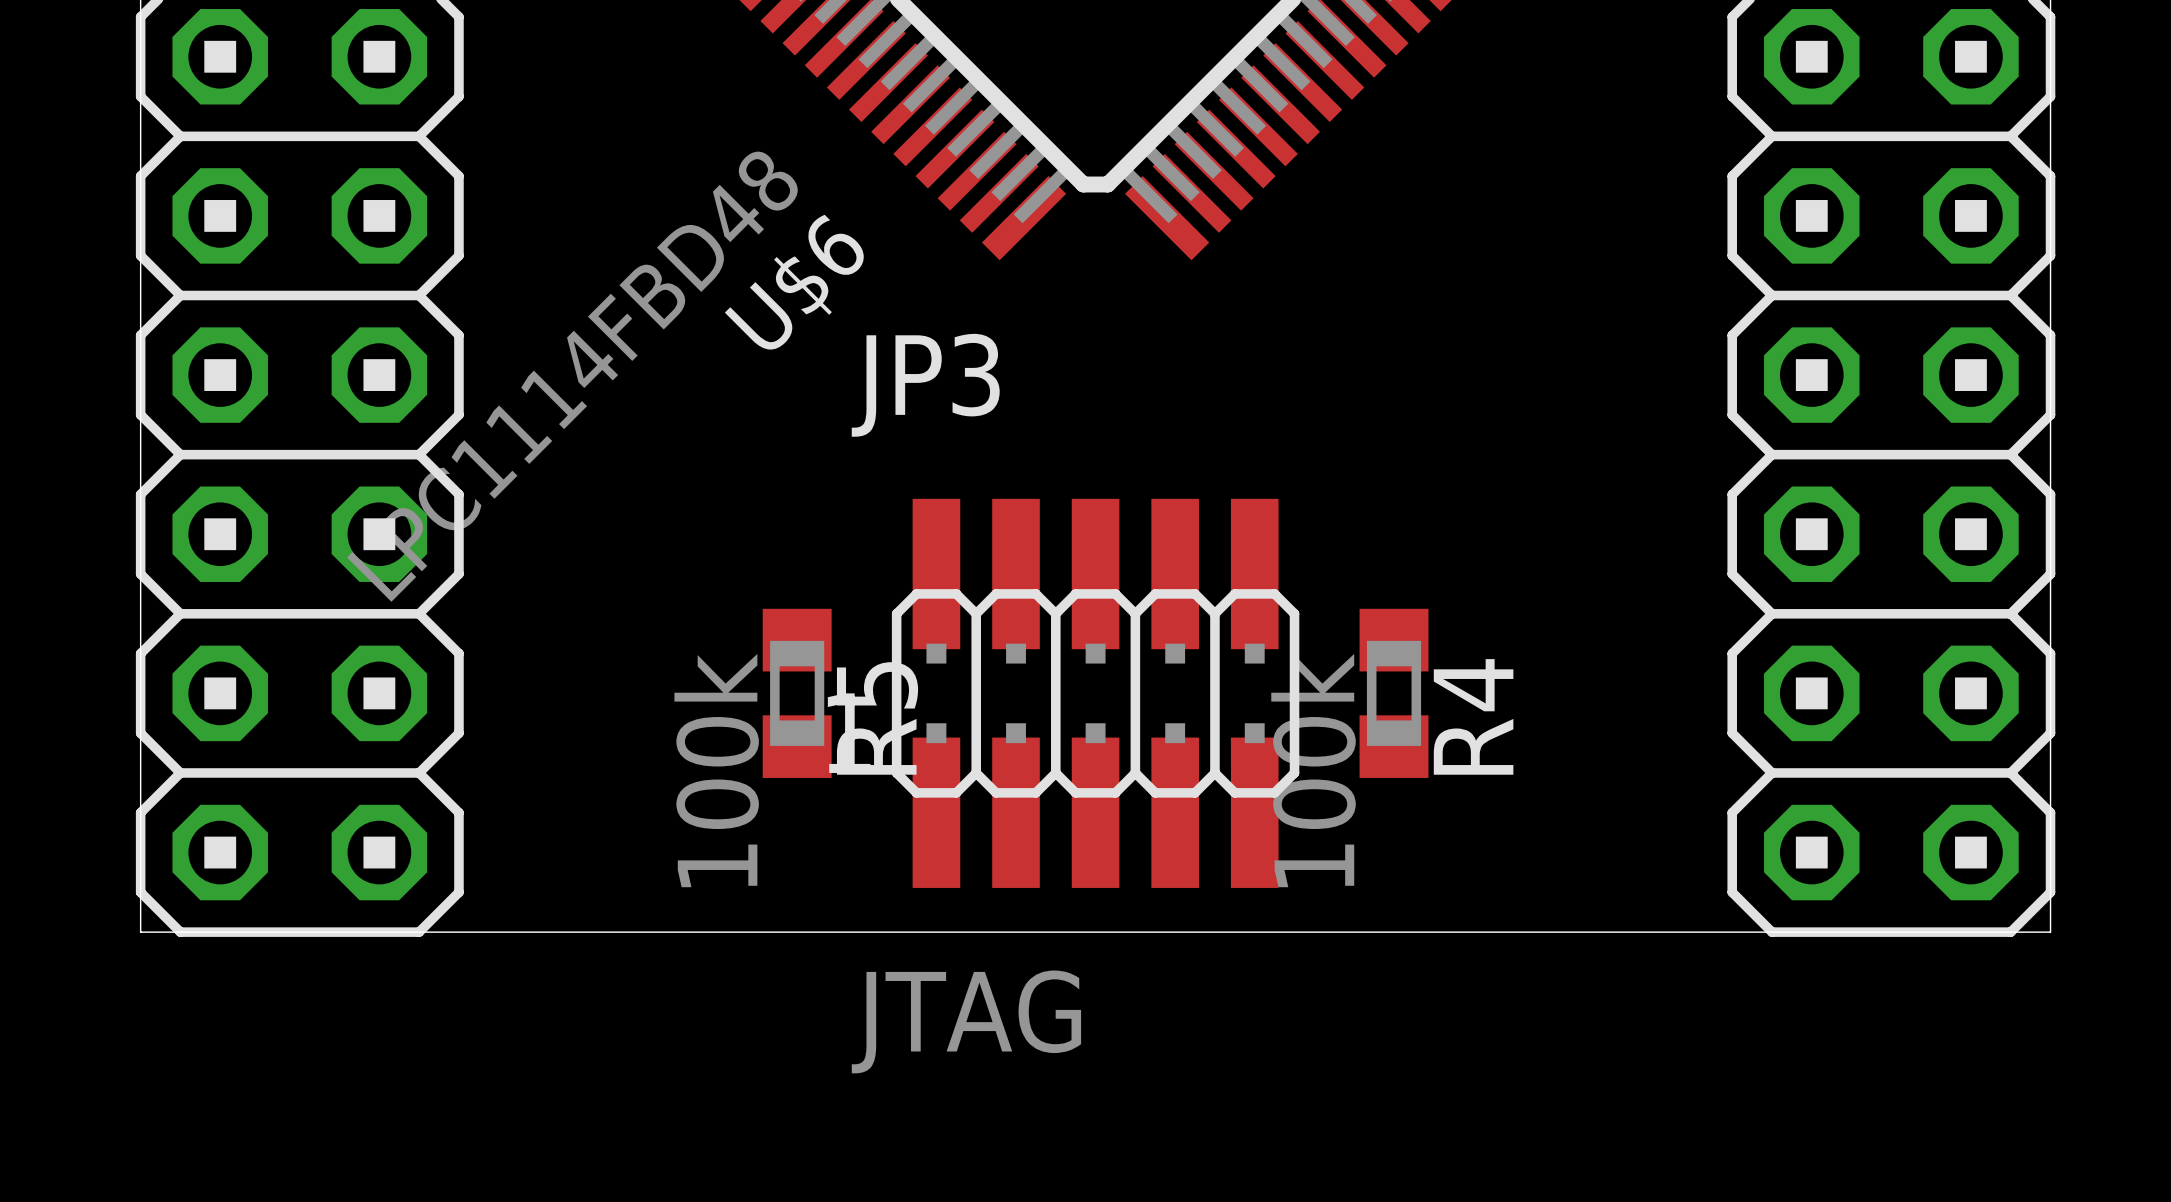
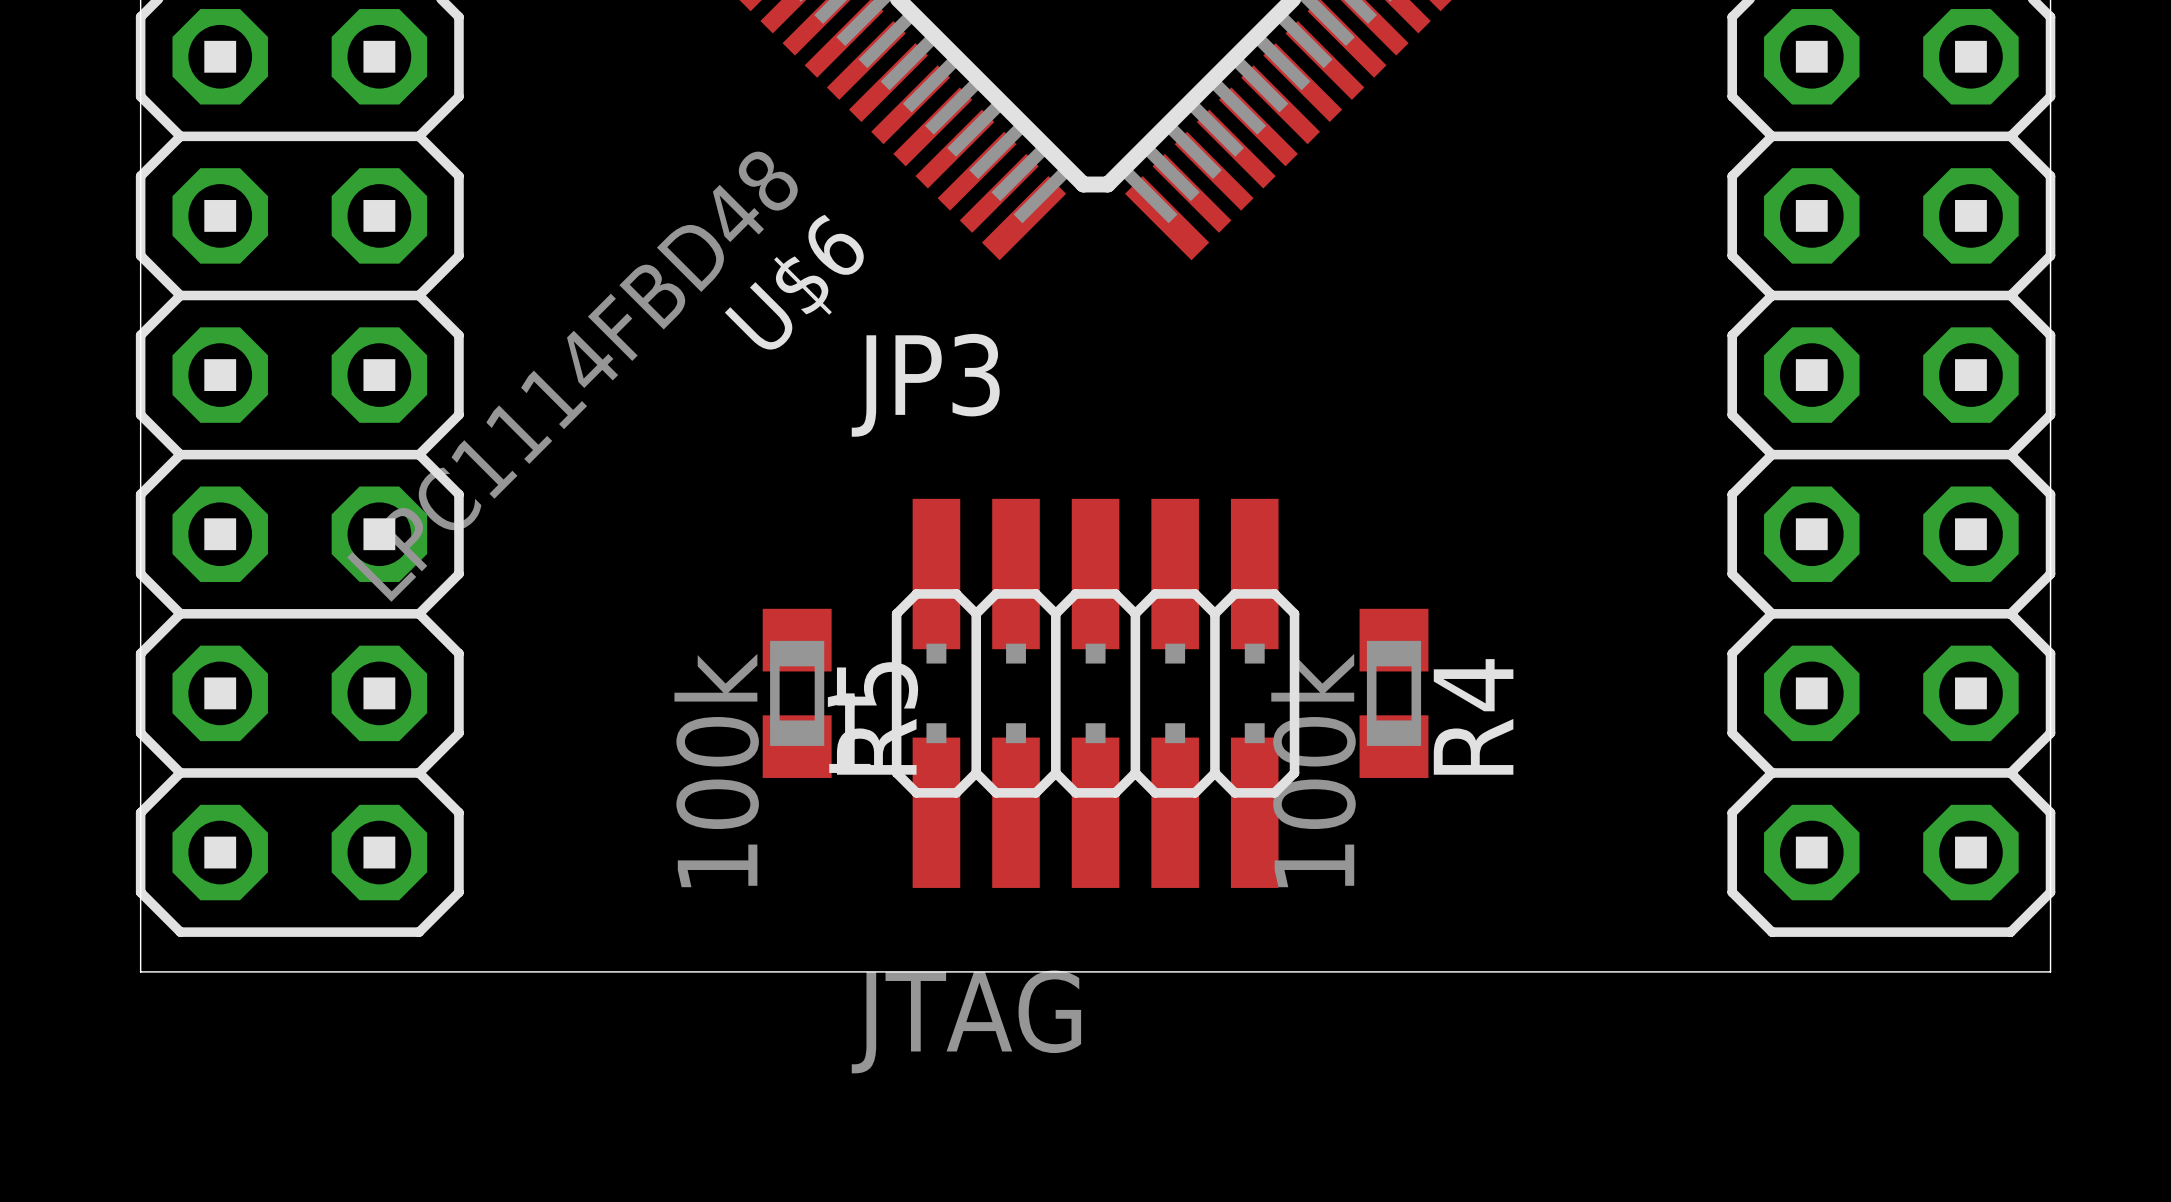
board edge: (140, 932) (2050, 932) -> (140, 932) (140, 971) (2050, 971) (2050, 932)

